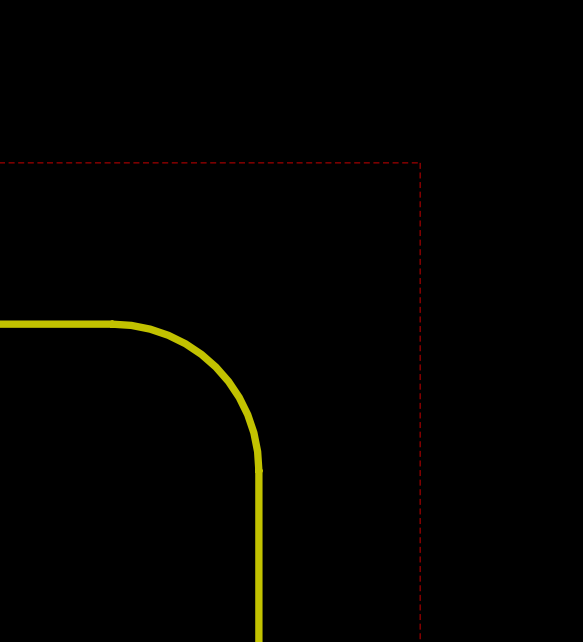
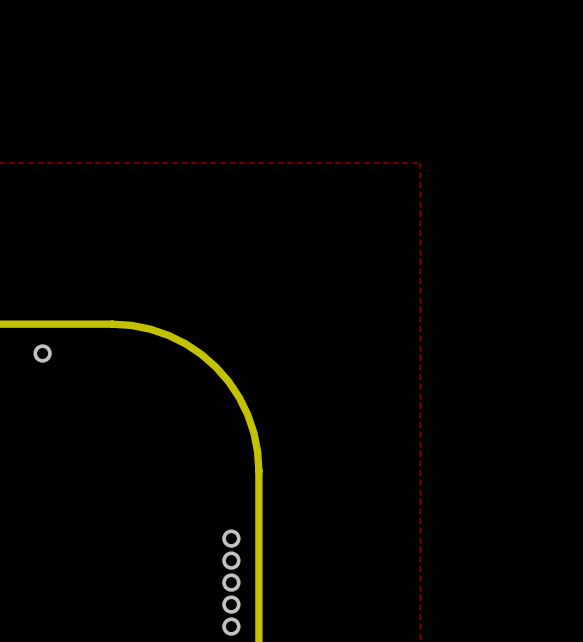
via: none -> (42, 353)
via: none -> (231, 538)
via: none -> (231, 560)
via: none -> (231, 582)
via: none -> (231, 604)
via: none -> (231, 626)

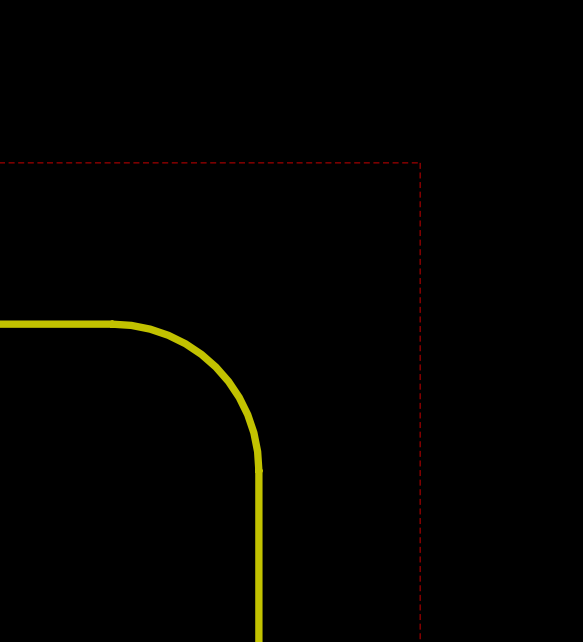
via: (42, 353) -> none
via: (231, 538) -> none
via: (231, 560) -> none
via: (231, 582) -> none
via: (231, 604) -> none
via: (231, 626) -> none

